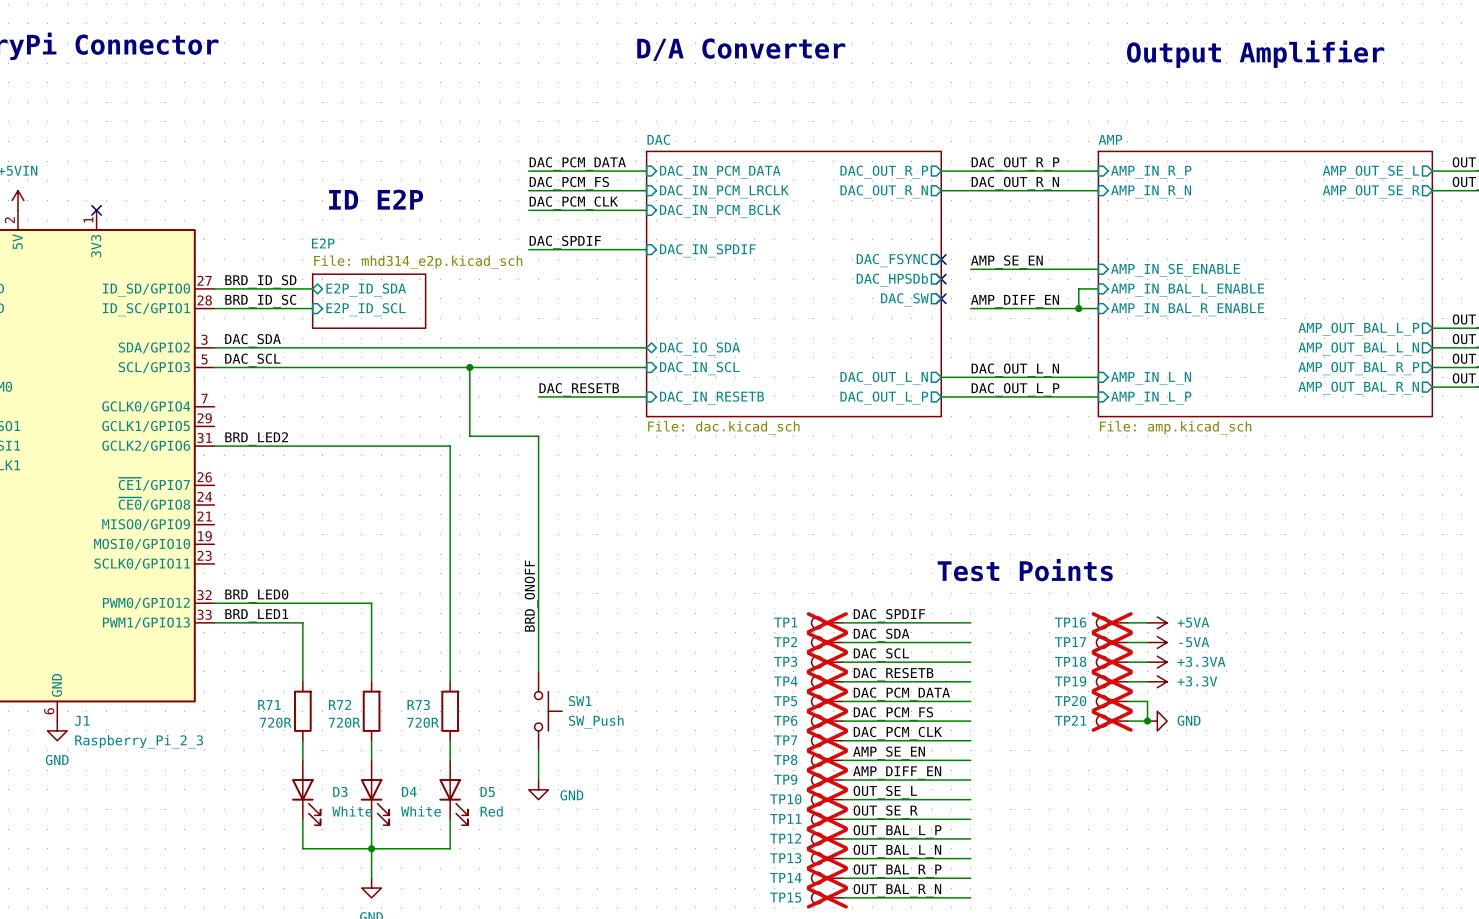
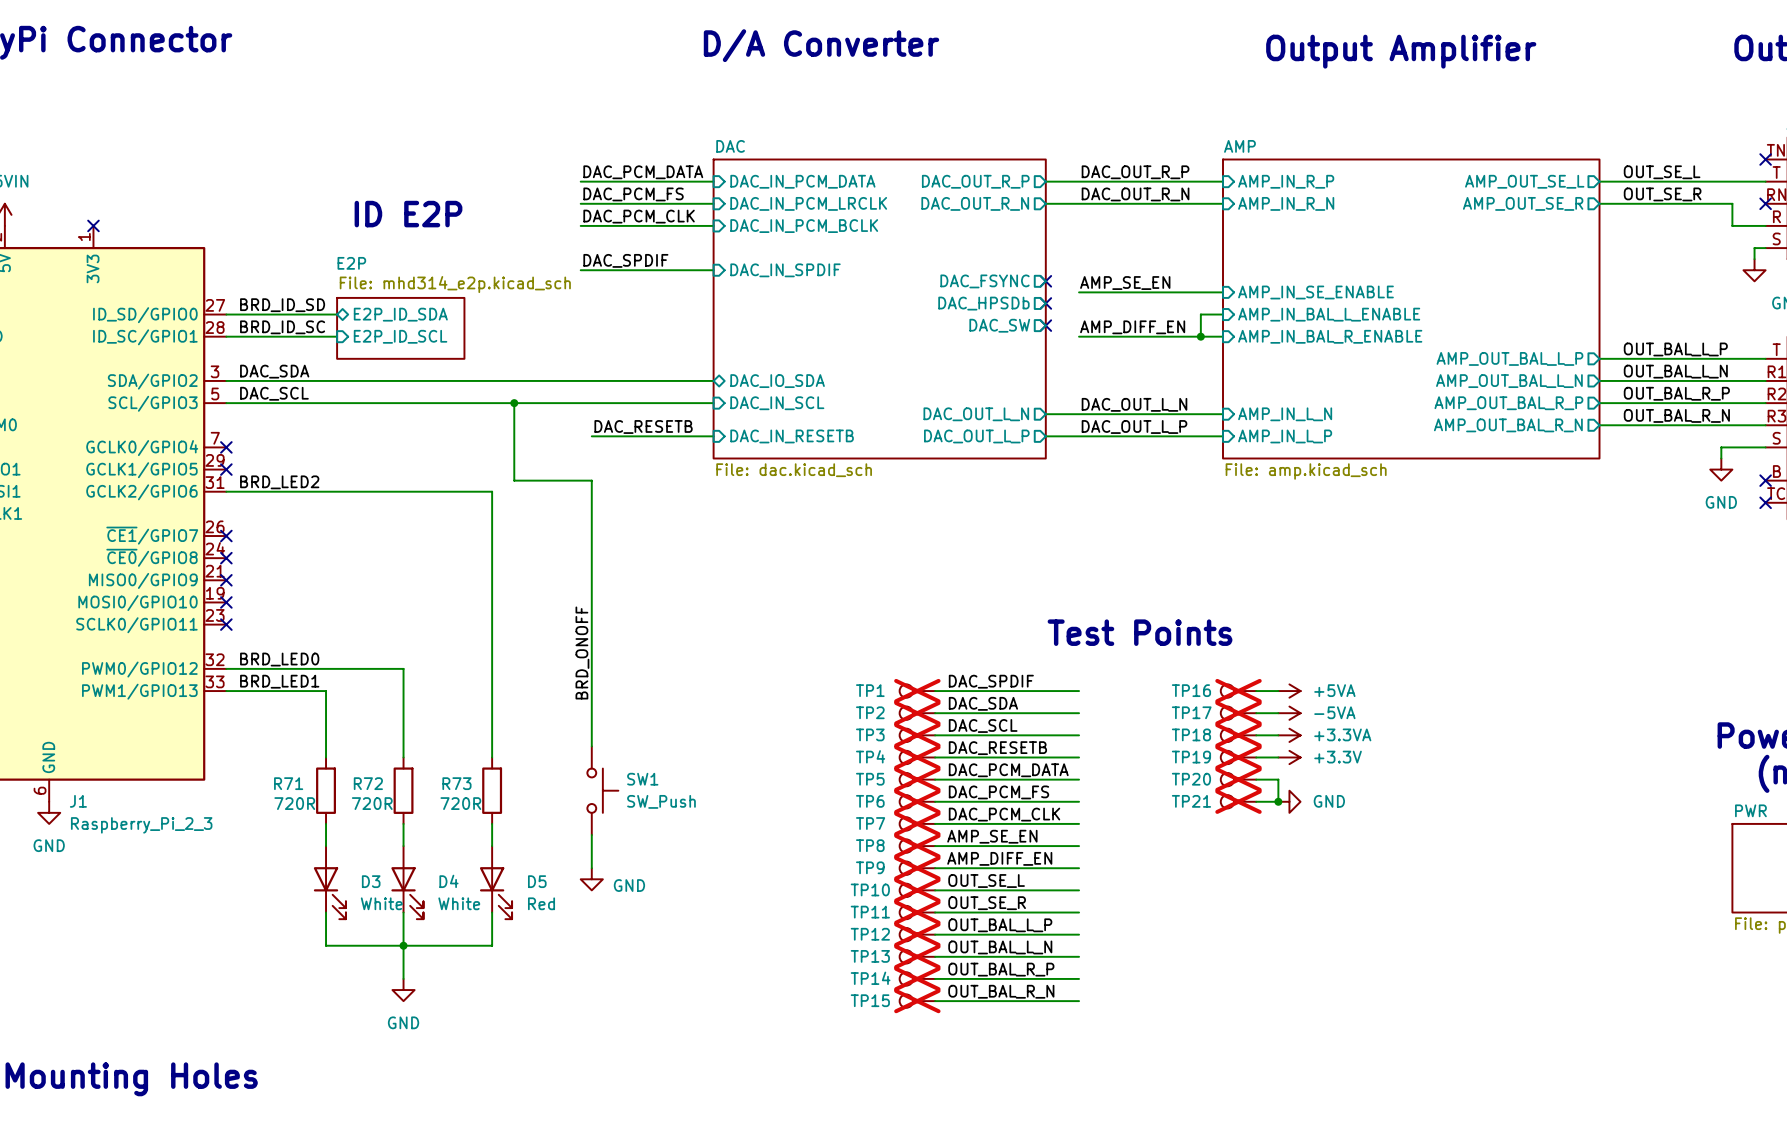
no-connect mark: none -> (226, 447)
no-connect mark: none -> (226, 469)
no-connect mark: none -> (226, 536)
no-connect mark: none -> (226, 558)
no-connect mark: none -> (226, 580)
no-connect mark: none -> (226, 602)
no-connect mark: none -> (226, 624)

